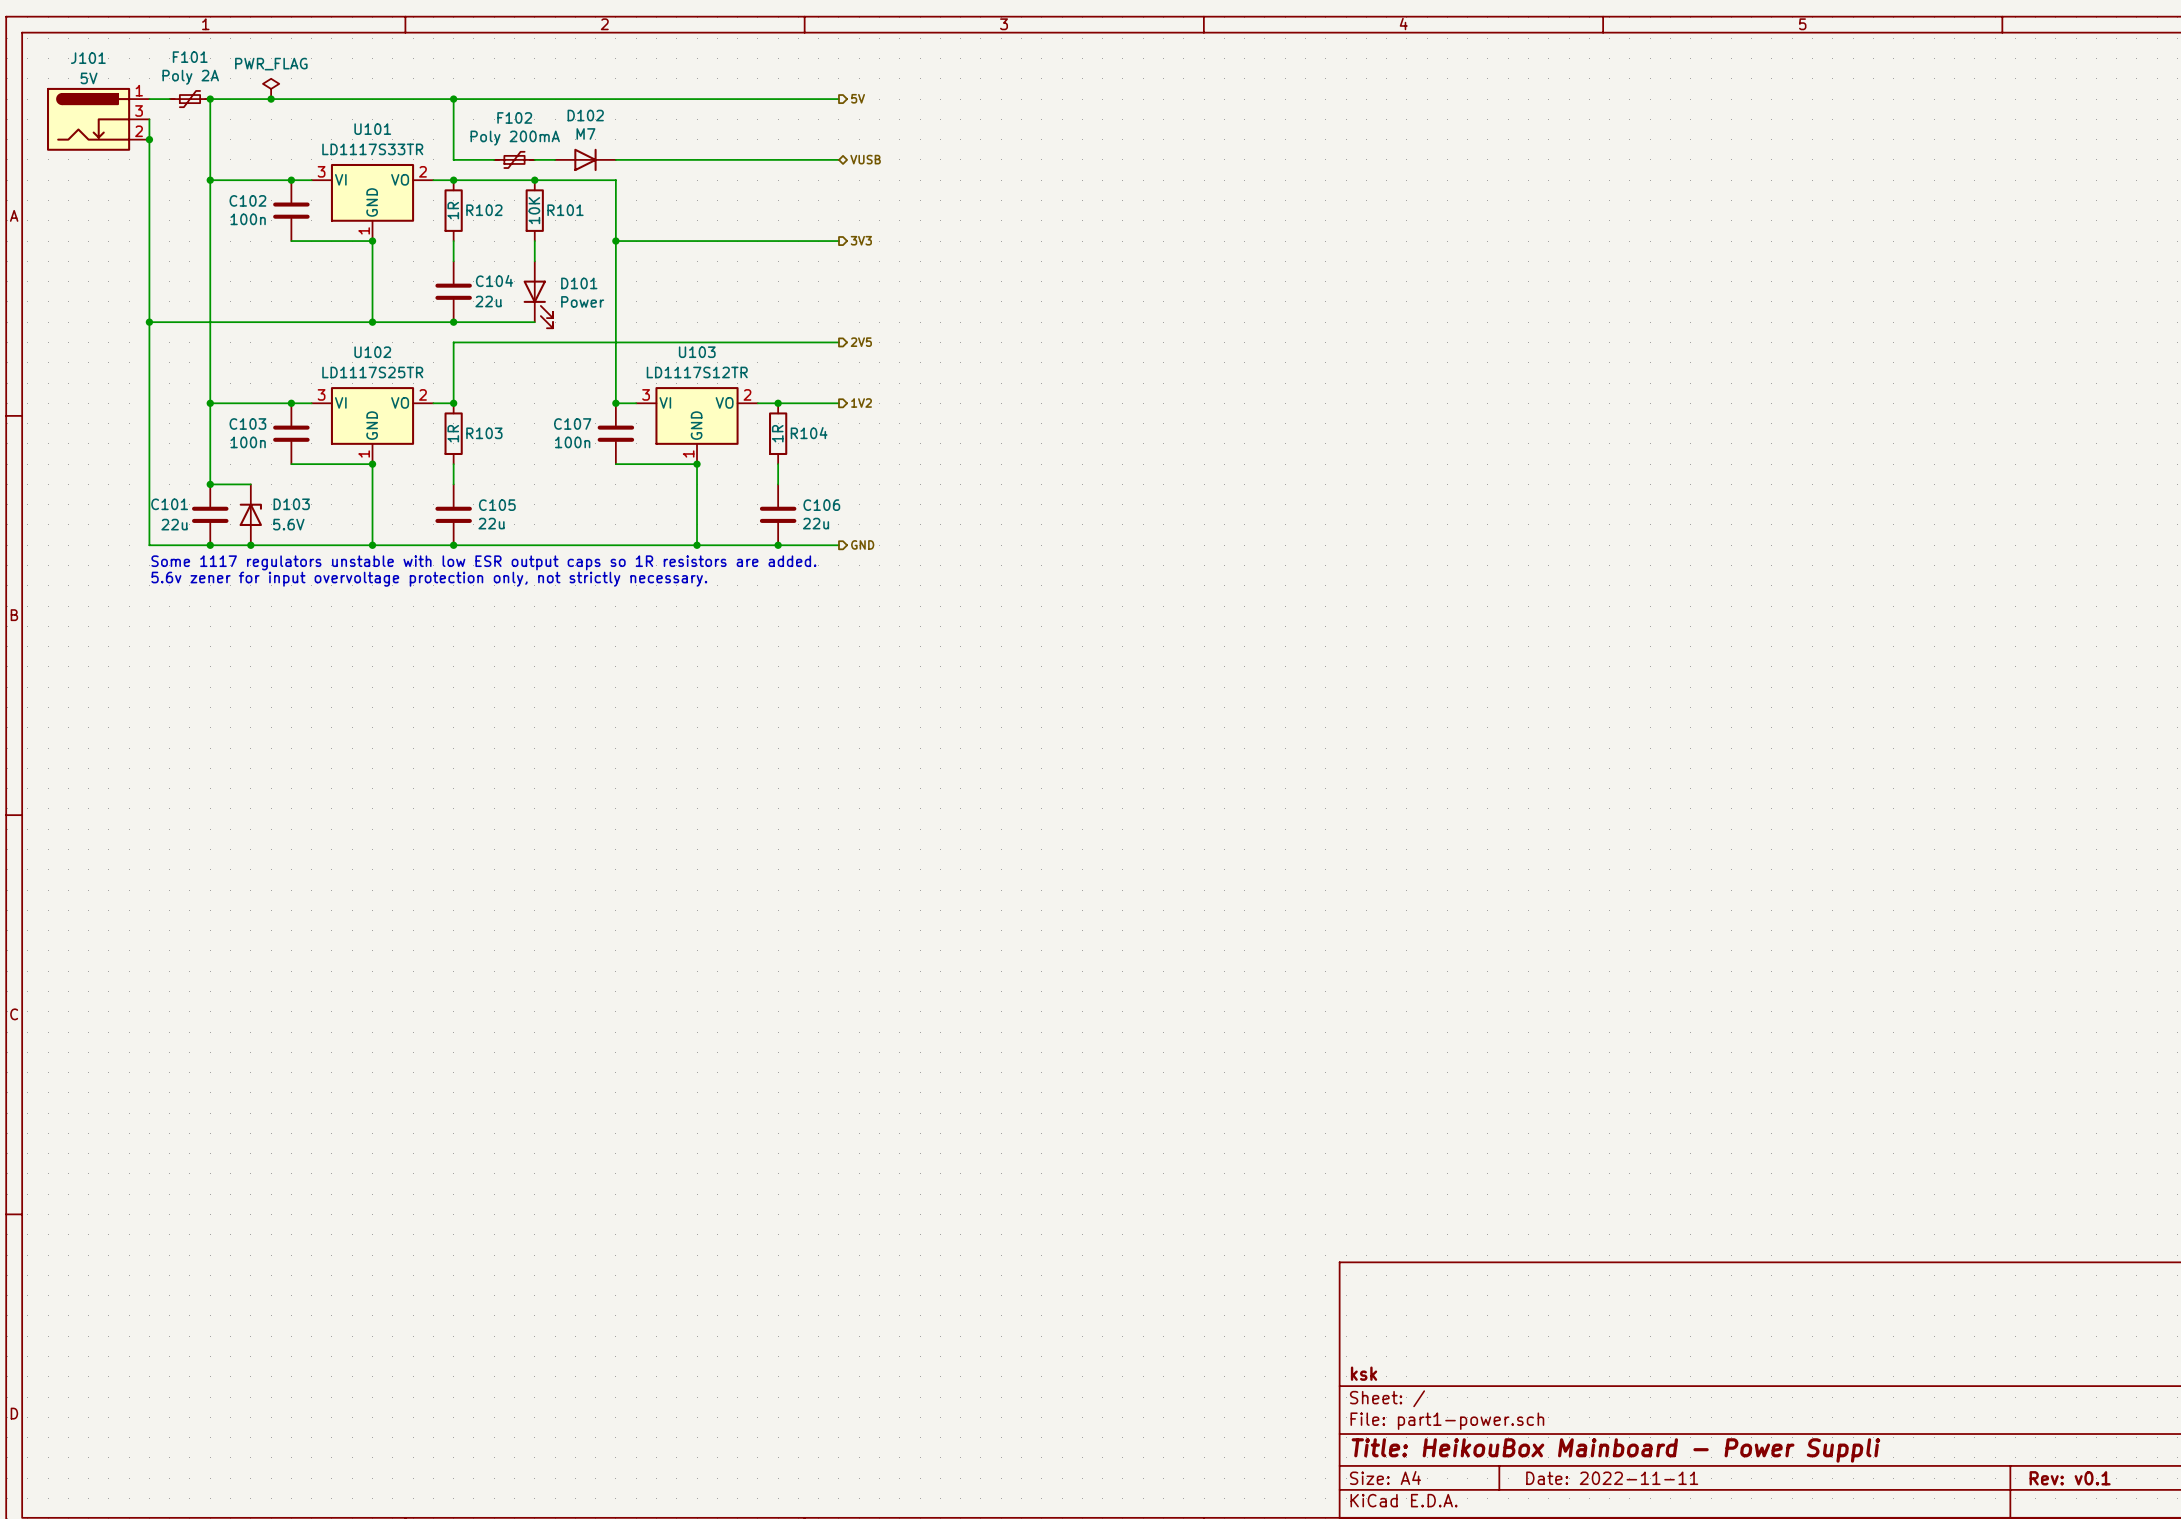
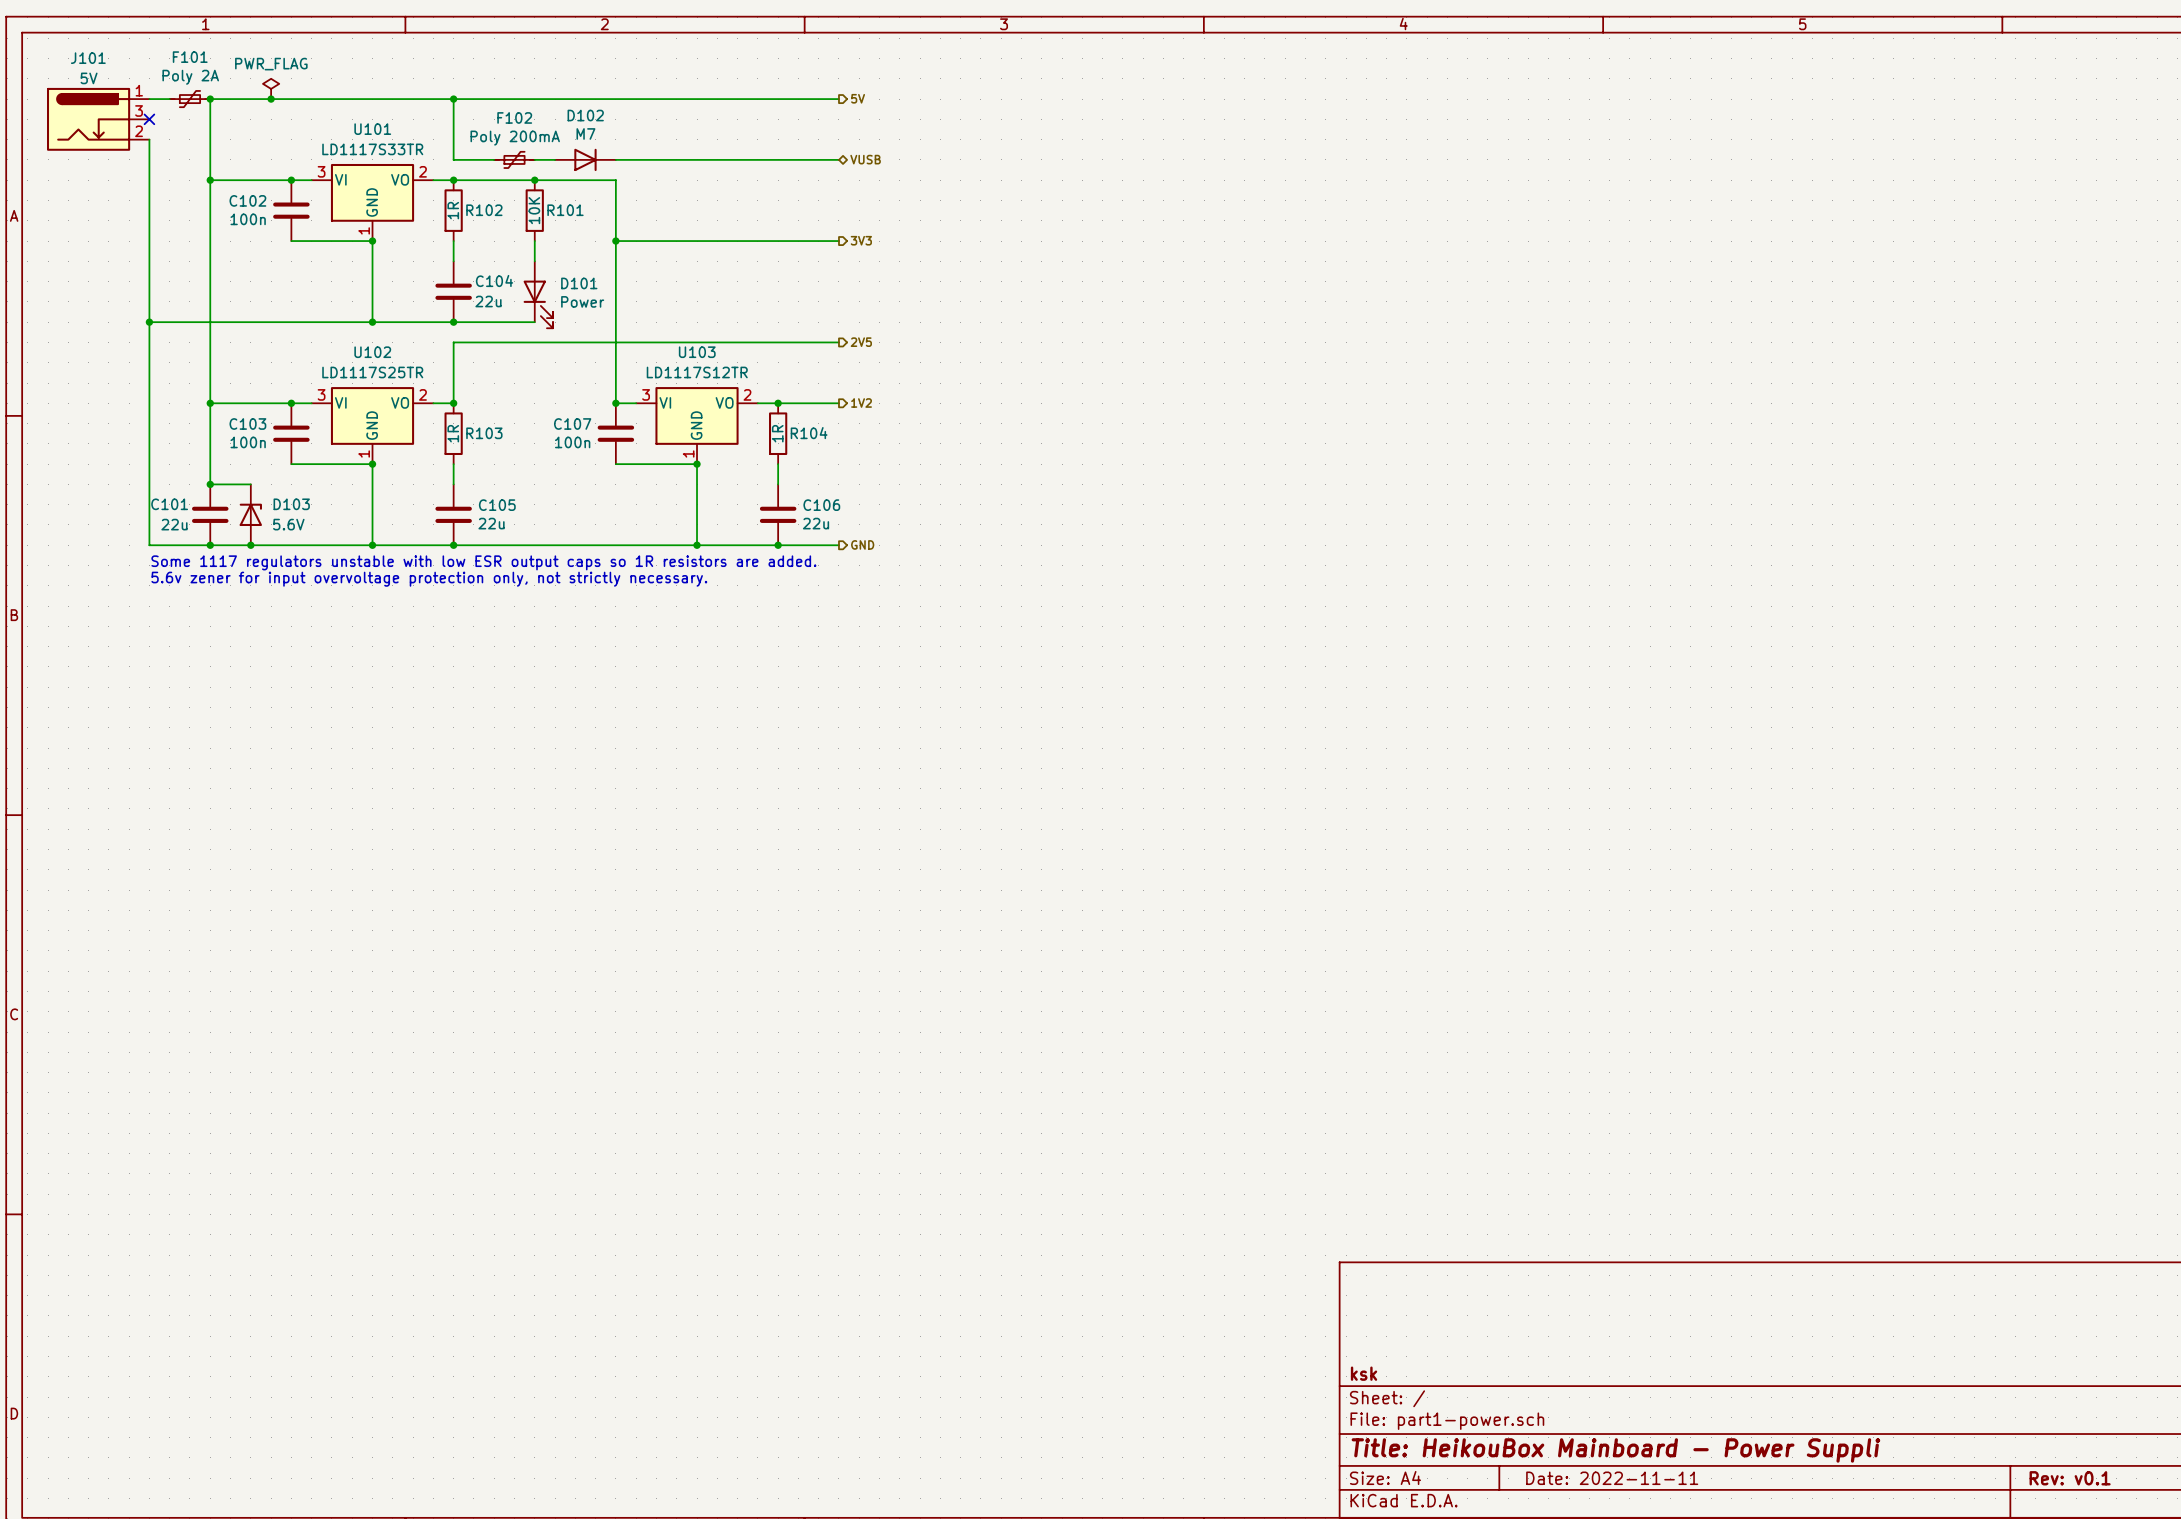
wire: (149, 119) (149, 139) -> none
no-connect mark: none -> (149, 119)
junction: (149, 139) -> none

